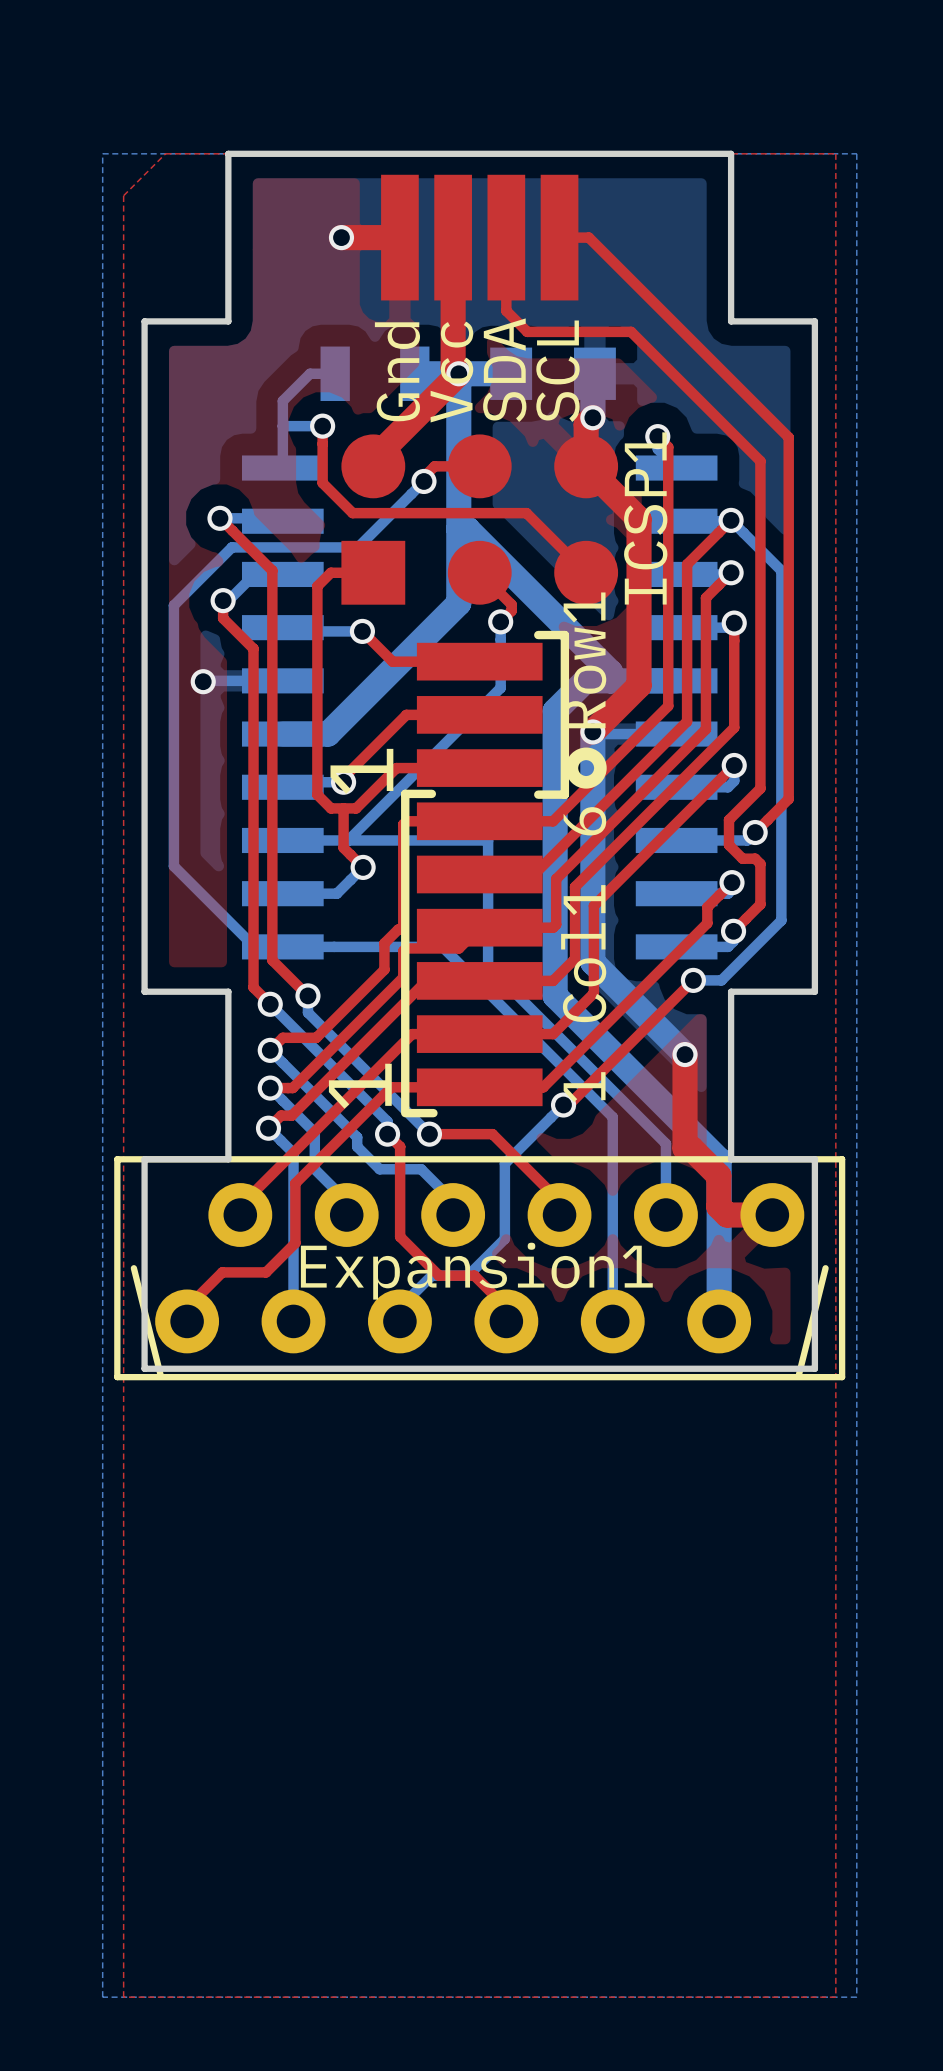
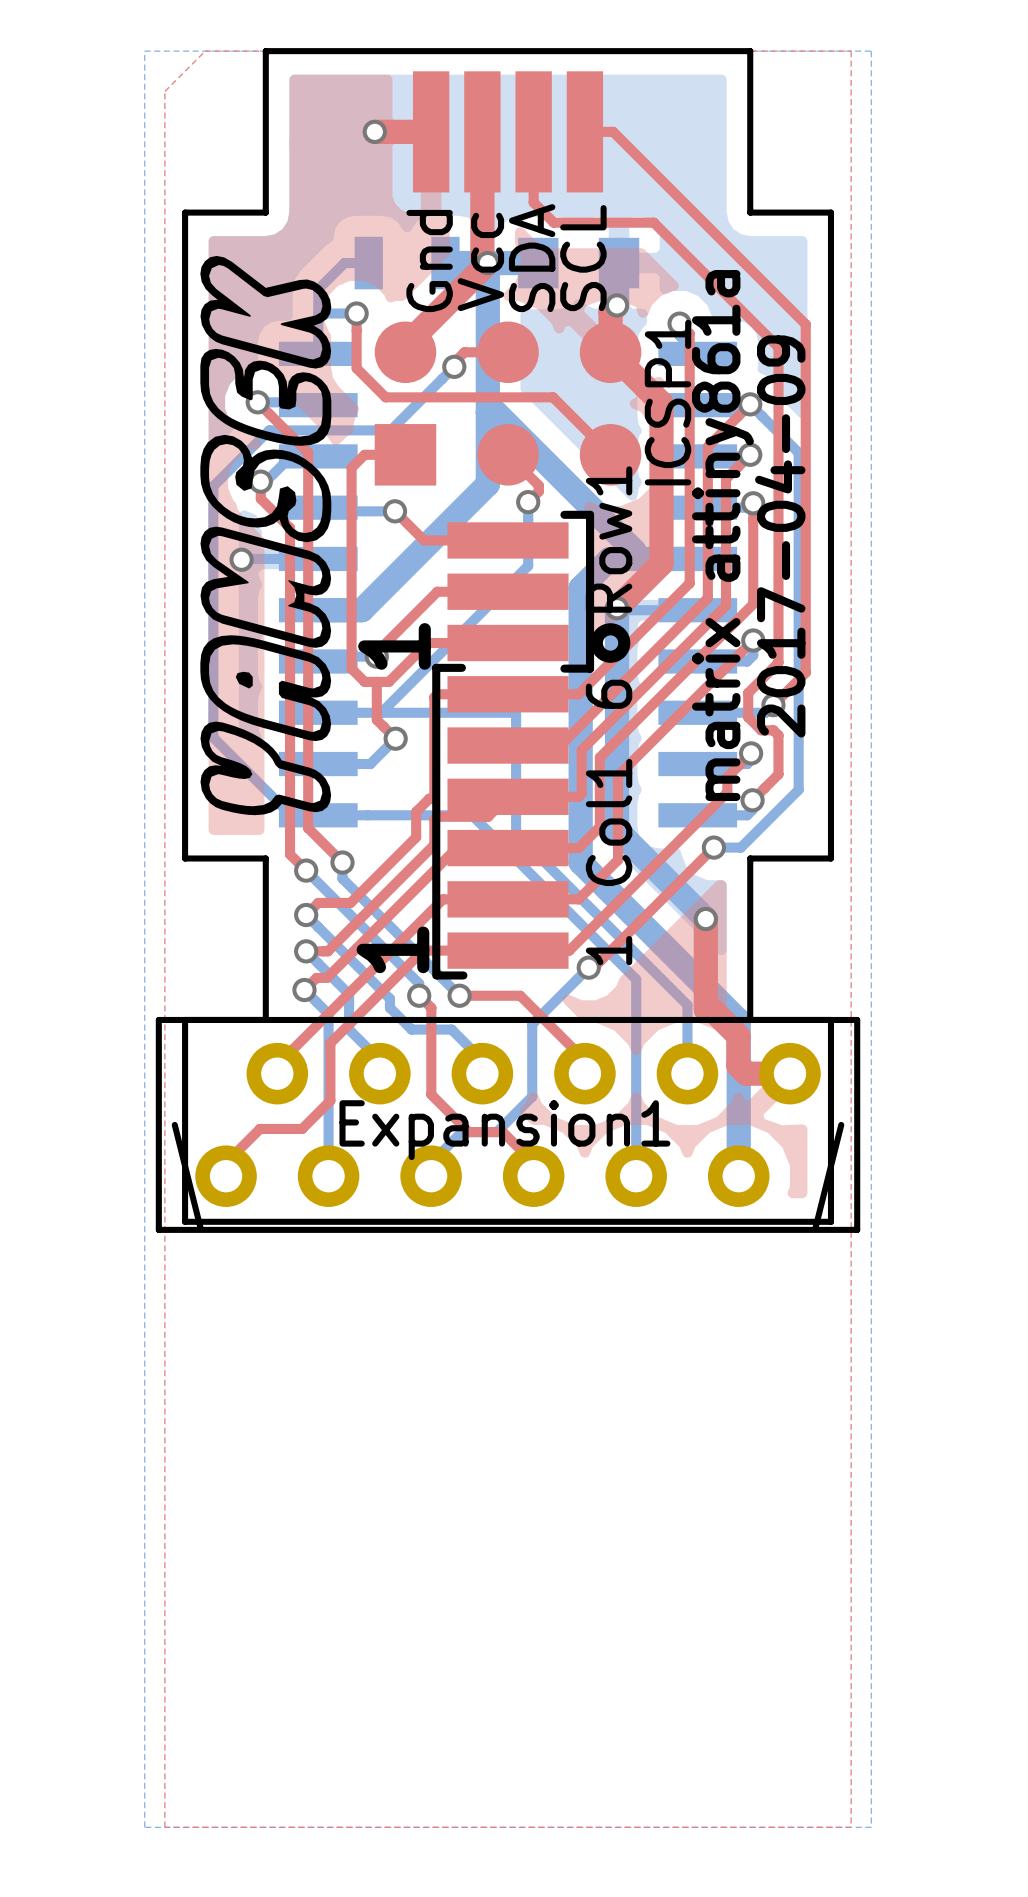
drawing: none -> [200, 255, 332, 816]
text: none -> matrix attiny861a (722, 535)
text: none -> 2017-04-09 (780, 536)

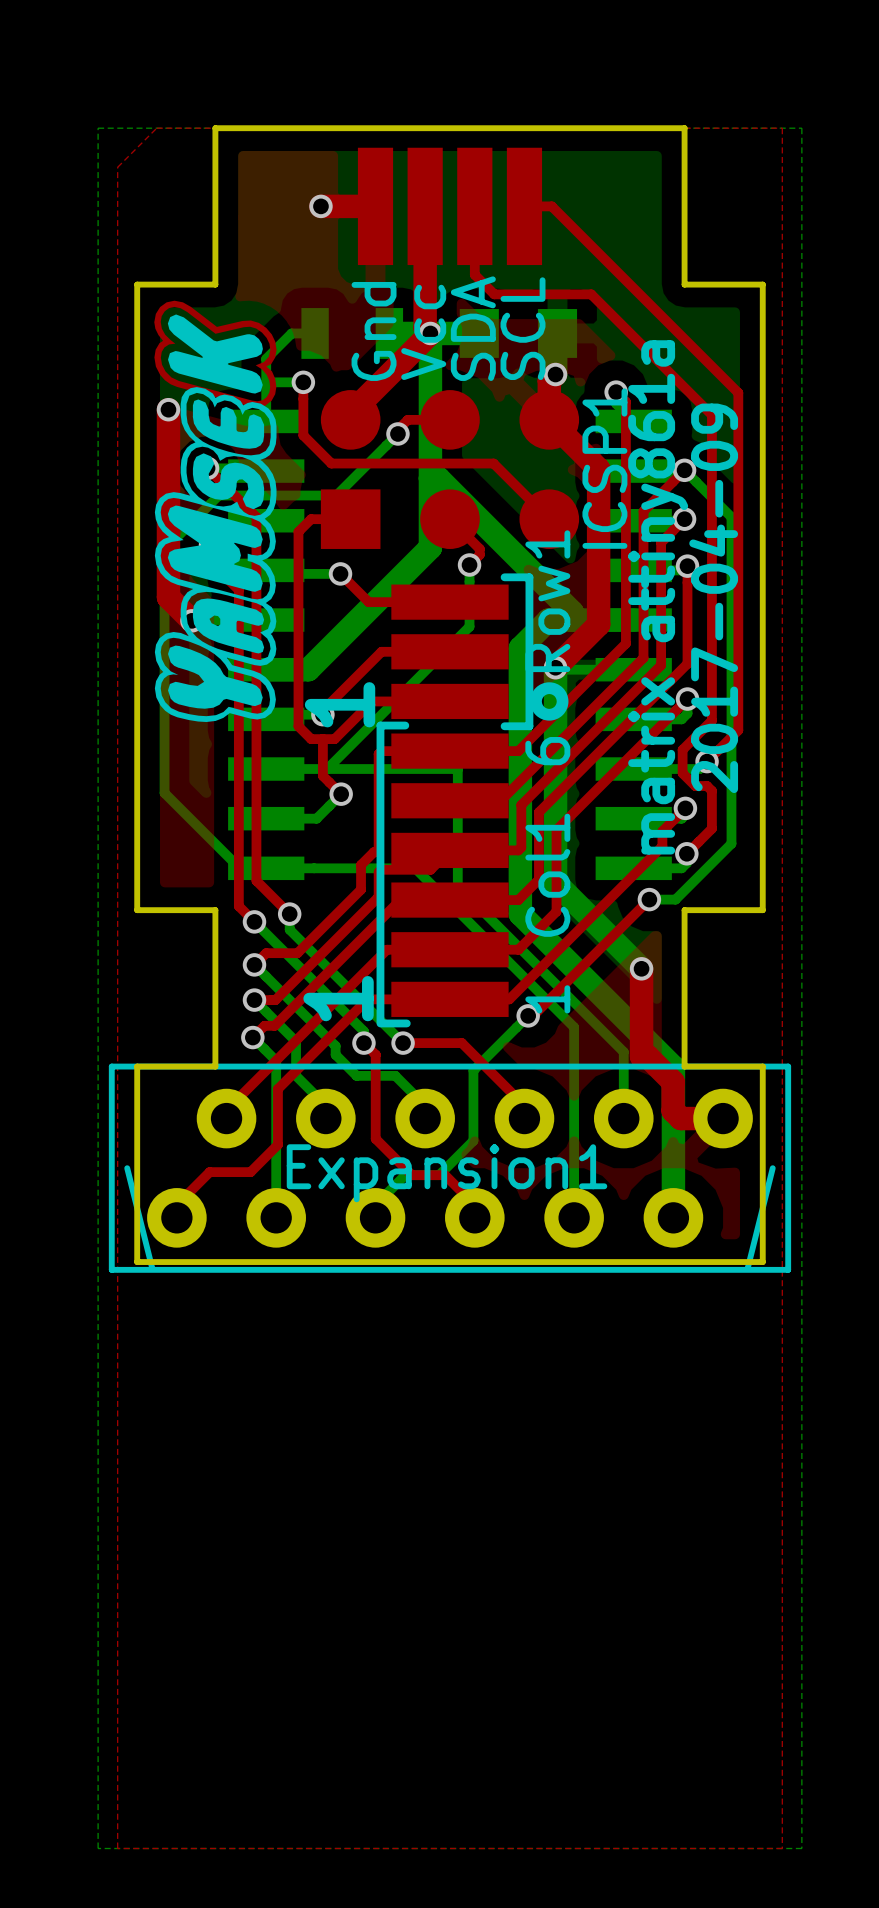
drawing: none -> [154, 300, 277, 723]
drawing: [200, 255, 332, 816] -> none
top track: none -> (168, 409) (168, 597) (191, 620)
via: none -> (168, 409)

